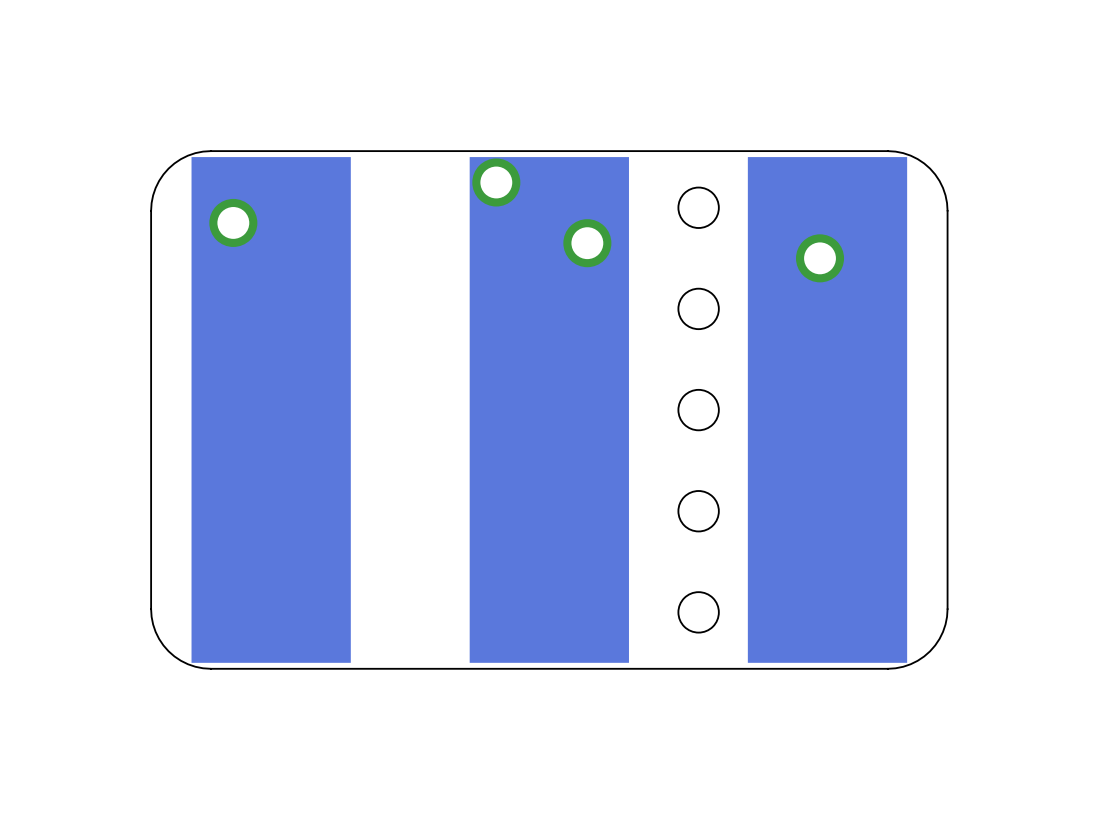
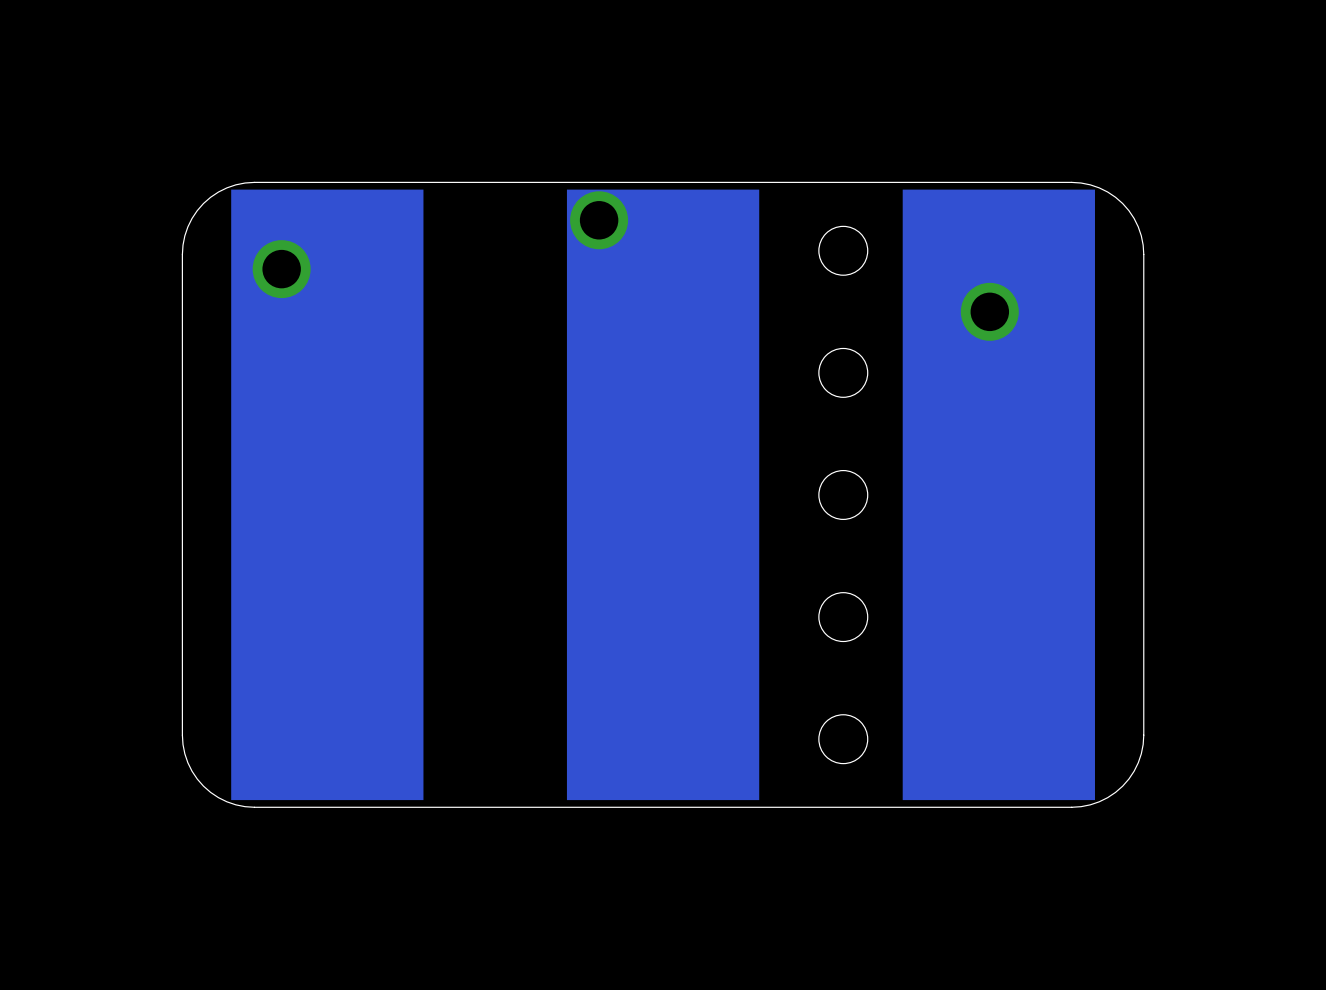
via: (587, 243) -> none

